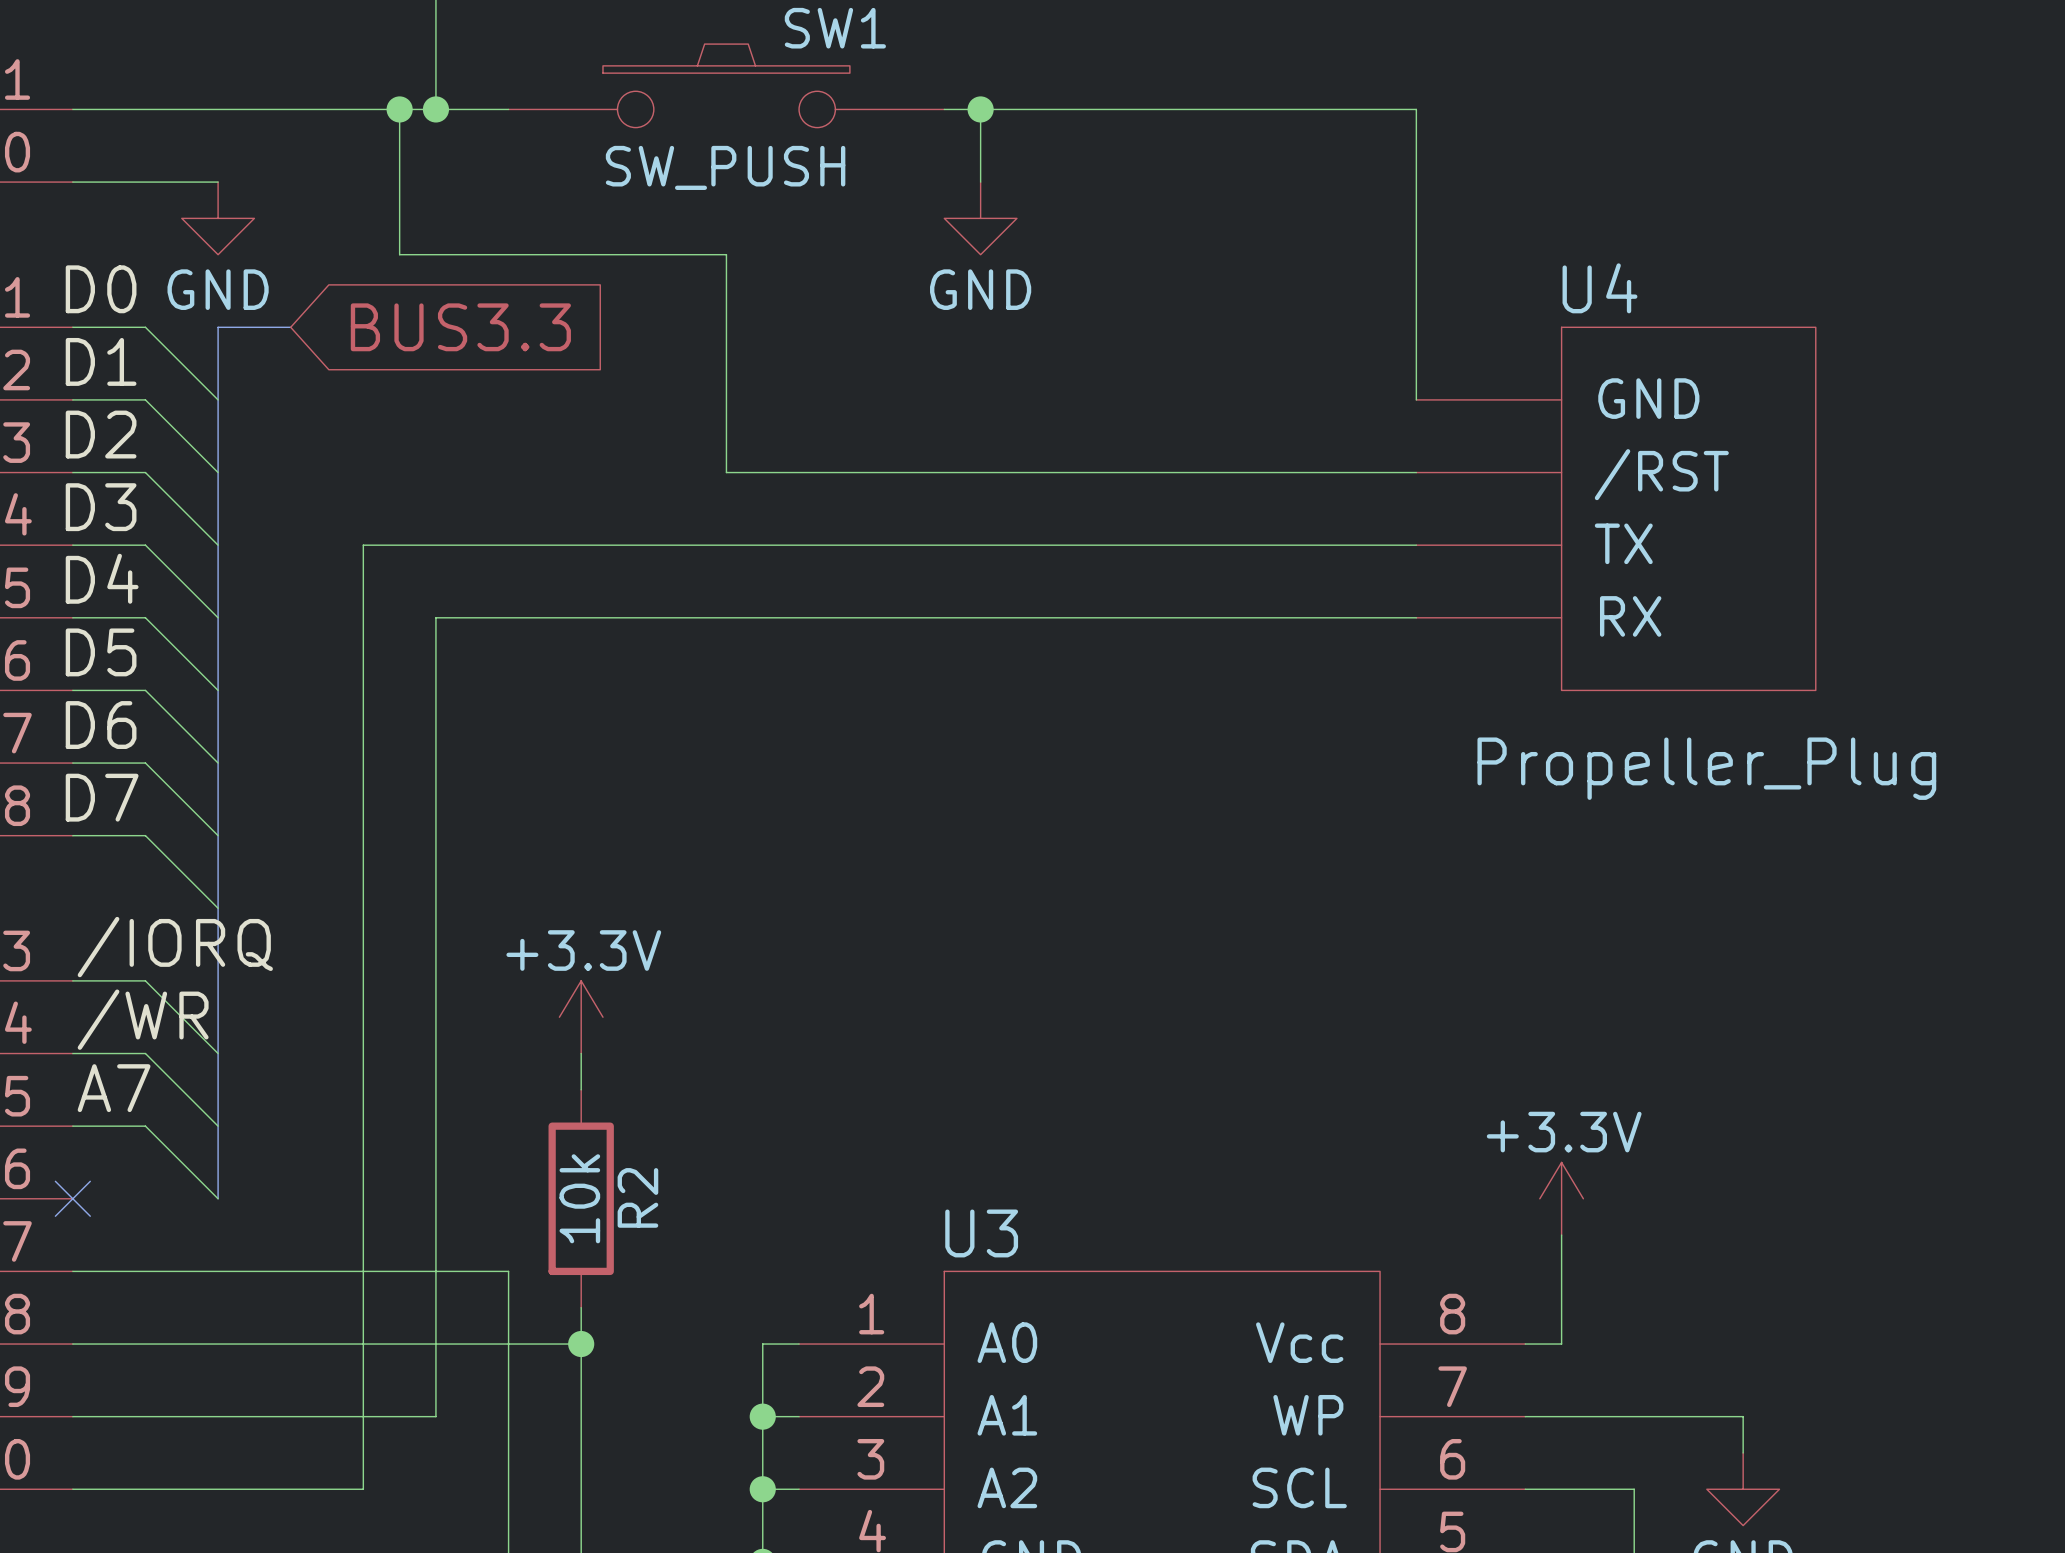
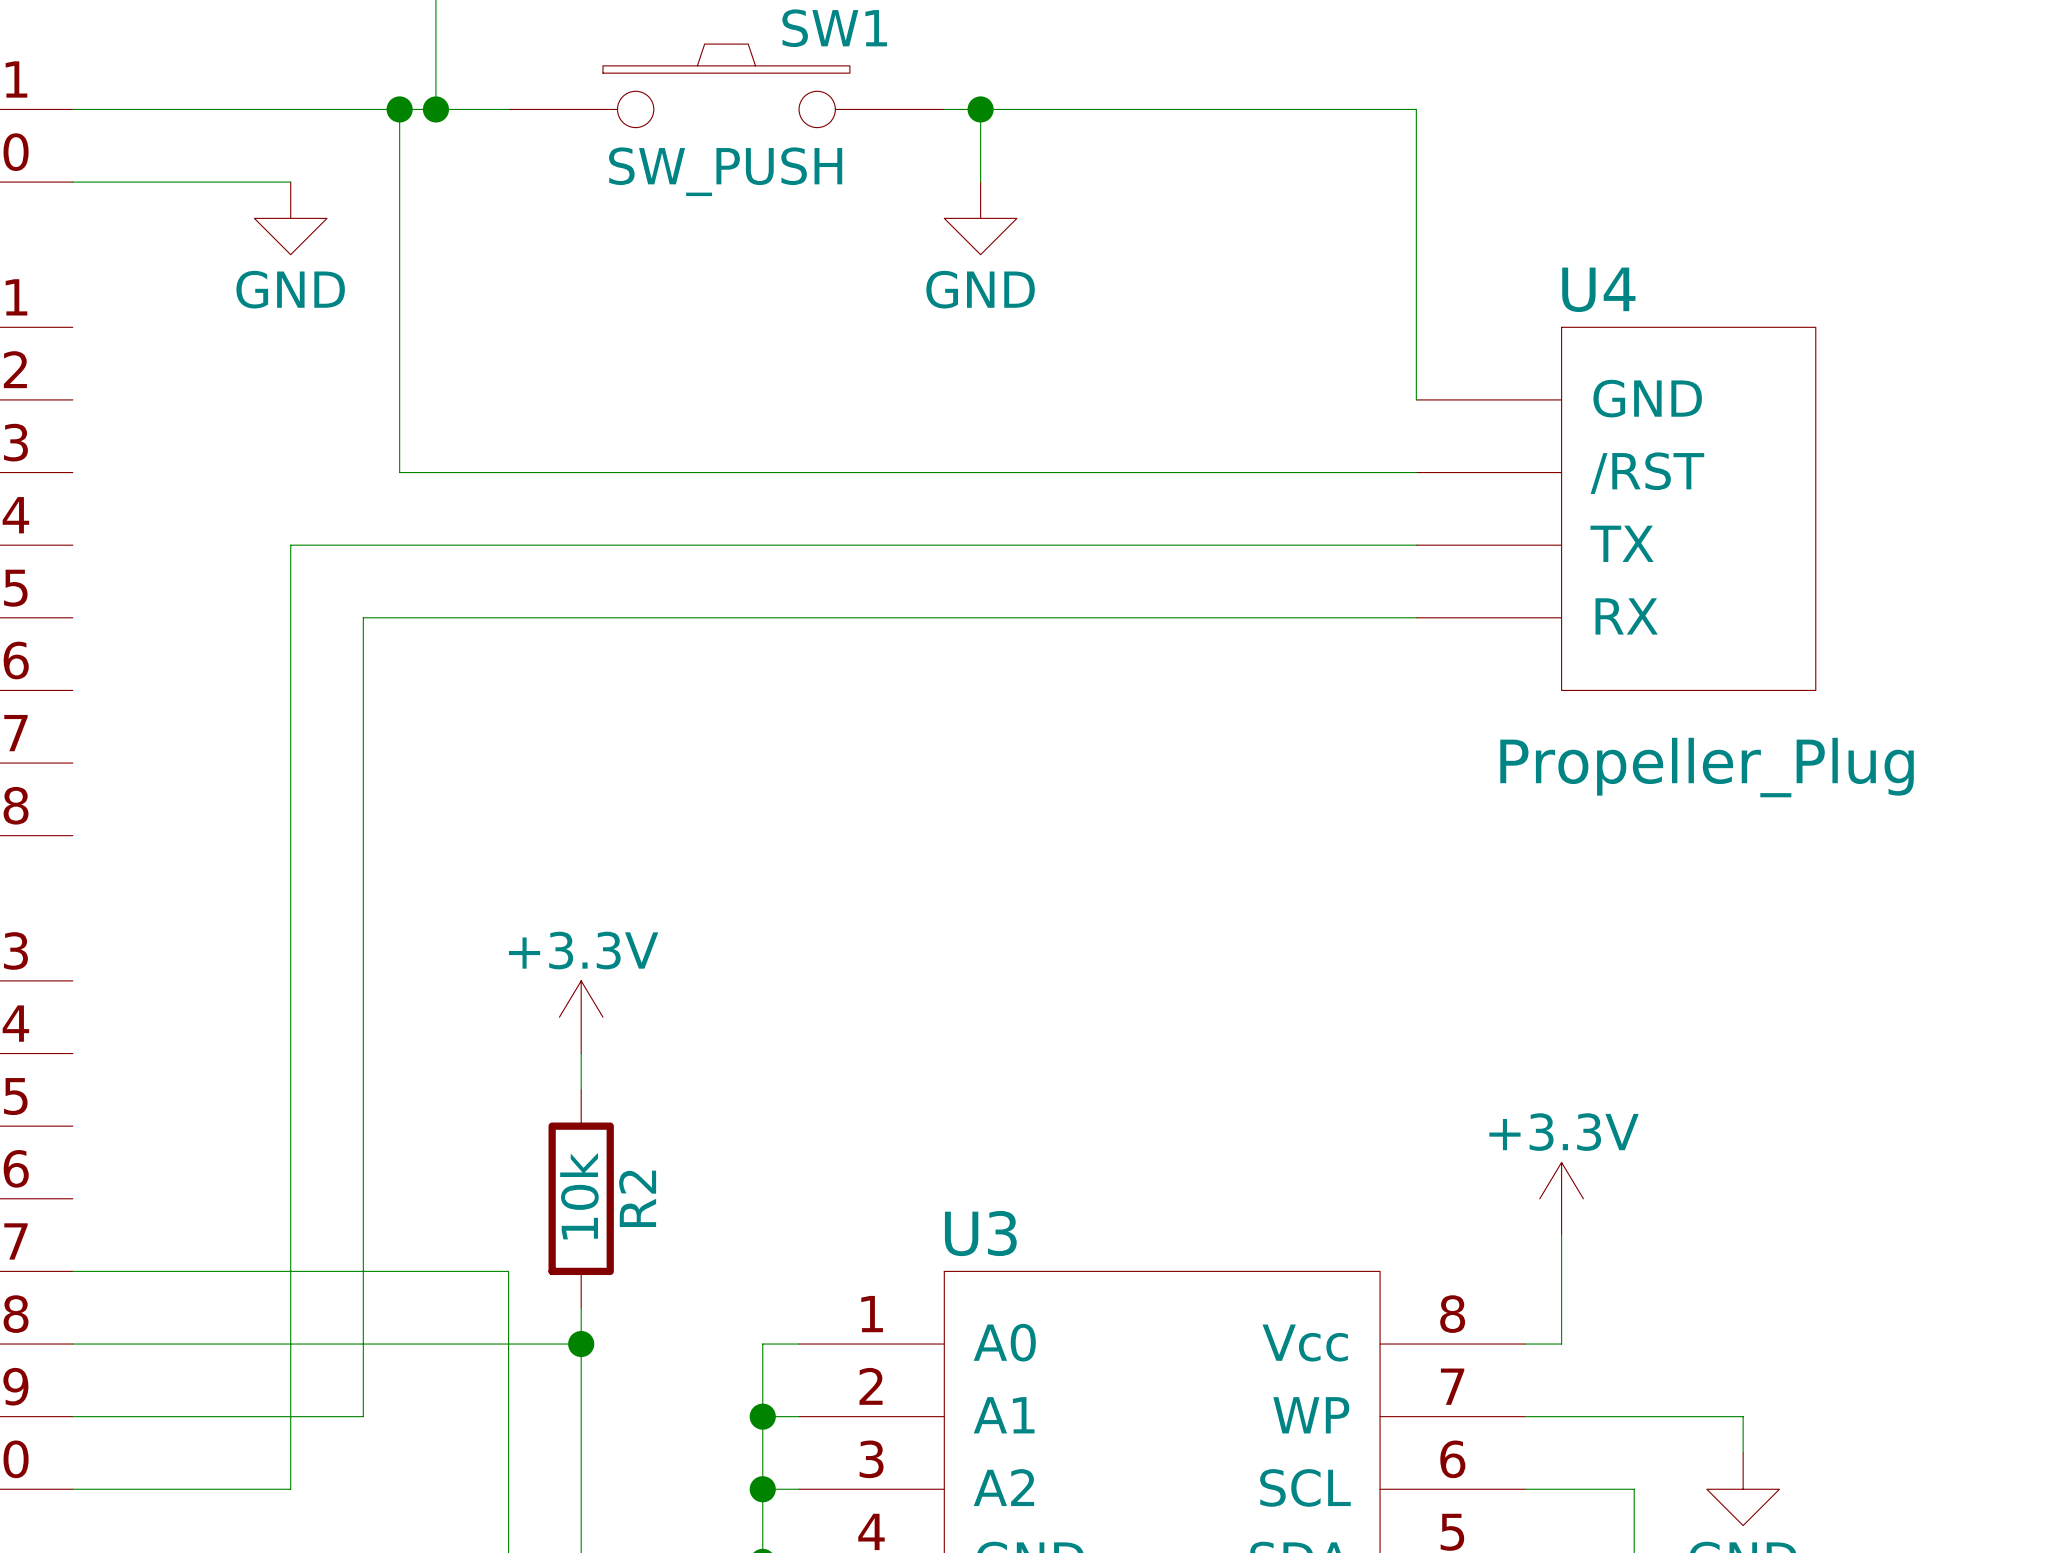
wire: none -> (218, 182) (290, 182)
power symbol position: GND (218, 218) -> GND (290, 218)
wire: (399, 254) (726, 254) (726, 472) -> (399, 254) (399, 472) (726, 472)
label: D0 (101, 289) -> none
wire: (72, 327) (145, 327) (218, 399) -> none
bus: (290, 327) (218, 327) (218, 1198) -> none
global label: BUS3.3 (460, 327) -> none
label: D1 (101, 361) -> none
wire: (72, 399) (145, 399) (218, 472) -> none
label: D2 (101, 434) -> none
wire: (72, 472) (145, 472) (218, 545) -> none
label: D3 (101, 507) -> none
wire: (72, 545) (145, 545) (218, 617) -> none
wire: (363, 545) (363, 617) -> (435, 617) (363, 617)
label: D4 (102, 578) -> none
wire: (72, 617) (145, 617) (218, 690) -> none
wire: (435, 617) (435, 1416) (363, 1416) (363, 1489) (290, 1489) -> (363, 545) (290, 545) (290, 1489)
label: D5 (101, 652) -> none
wire: (72, 690) (145, 690) (218, 763) -> none
label: D6 (101, 725) -> none
wire: (72, 763) (145, 763) (218, 835) -> none
label: D7 (102, 797) -> none
wire: (72, 835) (145, 835) (218, 908) -> none
label: /IORQ (175, 947) -> none
wire: (72, 980) (145, 980) (218, 1053) -> none
label: /WR (143, 1019) -> none
wire: (72, 1053) (145, 1053) (218, 1126) -> none
label: A7 (114, 1088) -> none
wire: (72, 1126) (145, 1126) (218, 1198) -> none
no-connect mark: (72, 1198) -> none

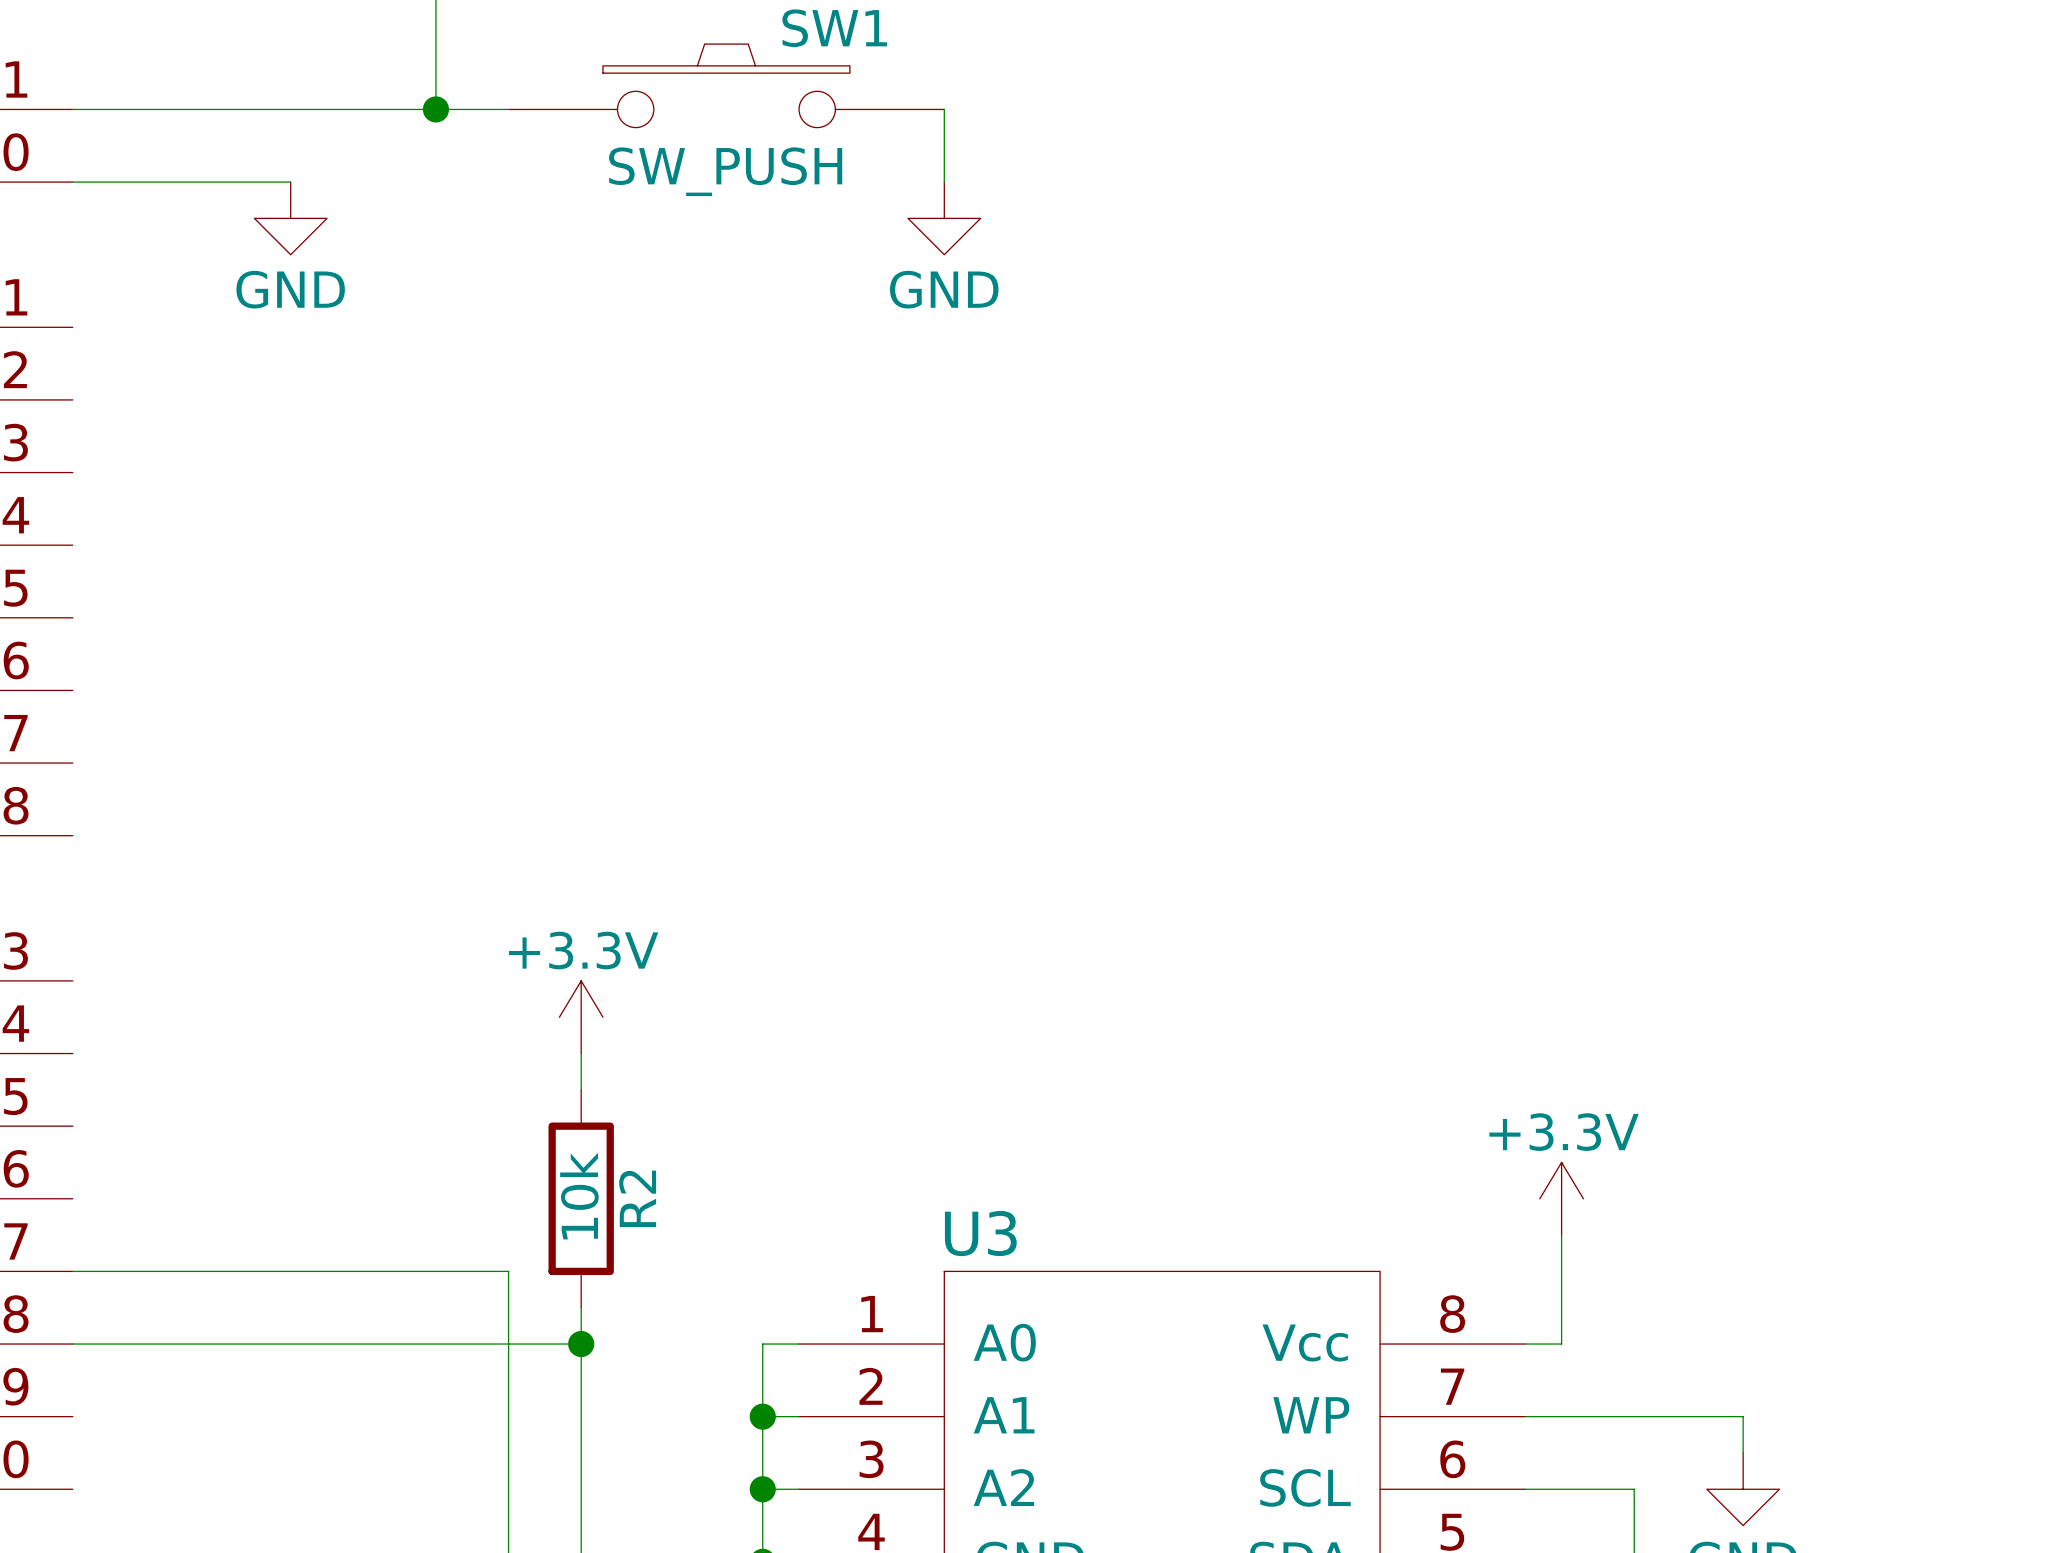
wire: (399, 109) (399, 472) (1416, 472) -> none
junction: (399, 109) -> none
wire: (944, 109) (1416, 109) (1416, 399) -> (944, 109) (944, 182)
wire: (980, 109) (980, 182) -> none
junction: (980, 109) -> none
power symbol position: GND (980, 218) -> GND (944, 218)
U4: Propeller_Plug (1616, 508) -> none
wire: (1416, 545) (290, 545) (290, 1489) (72, 1489) -> none
wire: (1416, 617) (363, 617) (363, 1416) (72, 1416) -> none

